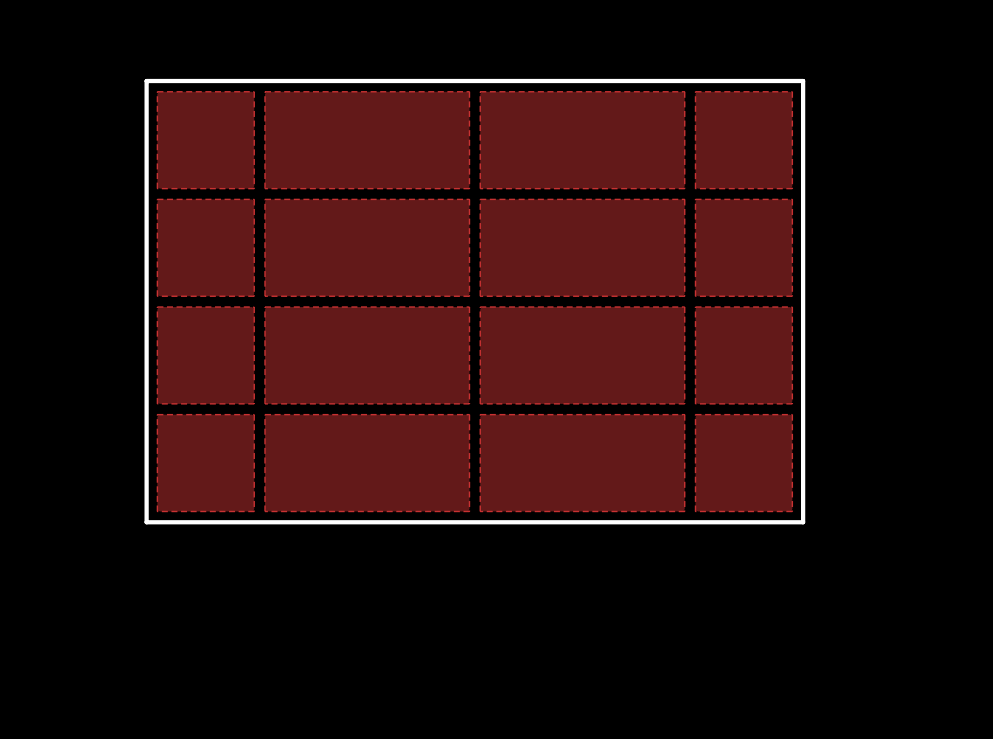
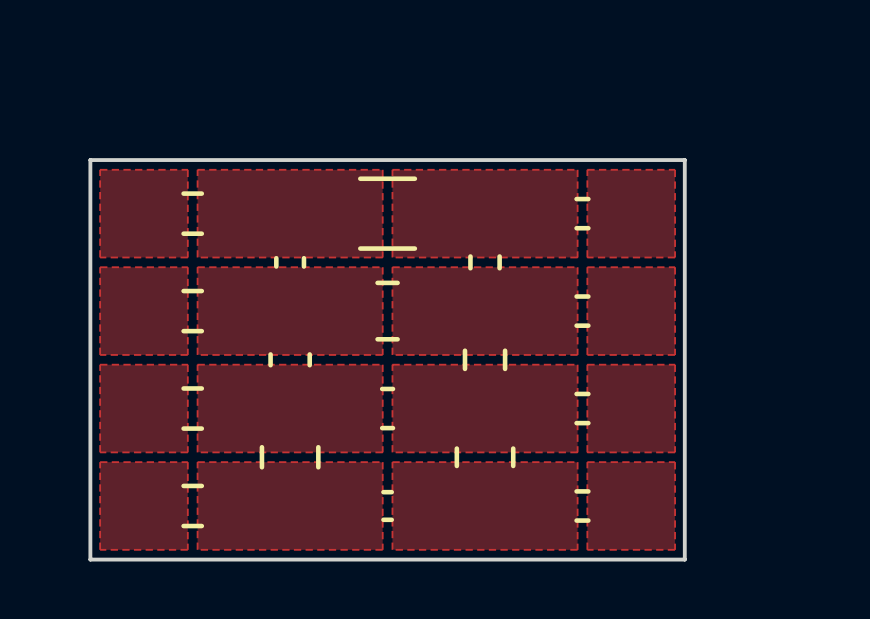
drawing: none -> [357, 176, 418, 431]
drawing: none -> [181, 191, 205, 236]
drawing: none -> [574, 196, 591, 231]
drawing: none -> [468, 254, 502, 271]
drawing: none -> [274, 255, 307, 269]
drawing: none -> [181, 288, 205, 334]
drawing: none -> [574, 294, 591, 328]
drawing: none -> [462, 348, 508, 372]
drawing: none -> [268, 352, 313, 368]
drawing: none -> [181, 386, 205, 431]
drawing: none -> [574, 391, 591, 426]
drawing: none -> [259, 444, 321, 470]
drawing: none -> [454, 446, 516, 469]
drawing: none -> [181, 483, 205, 529]
drawing: none -> [574, 489, 591, 523]
drawing: none -> [381, 489, 395, 523]

